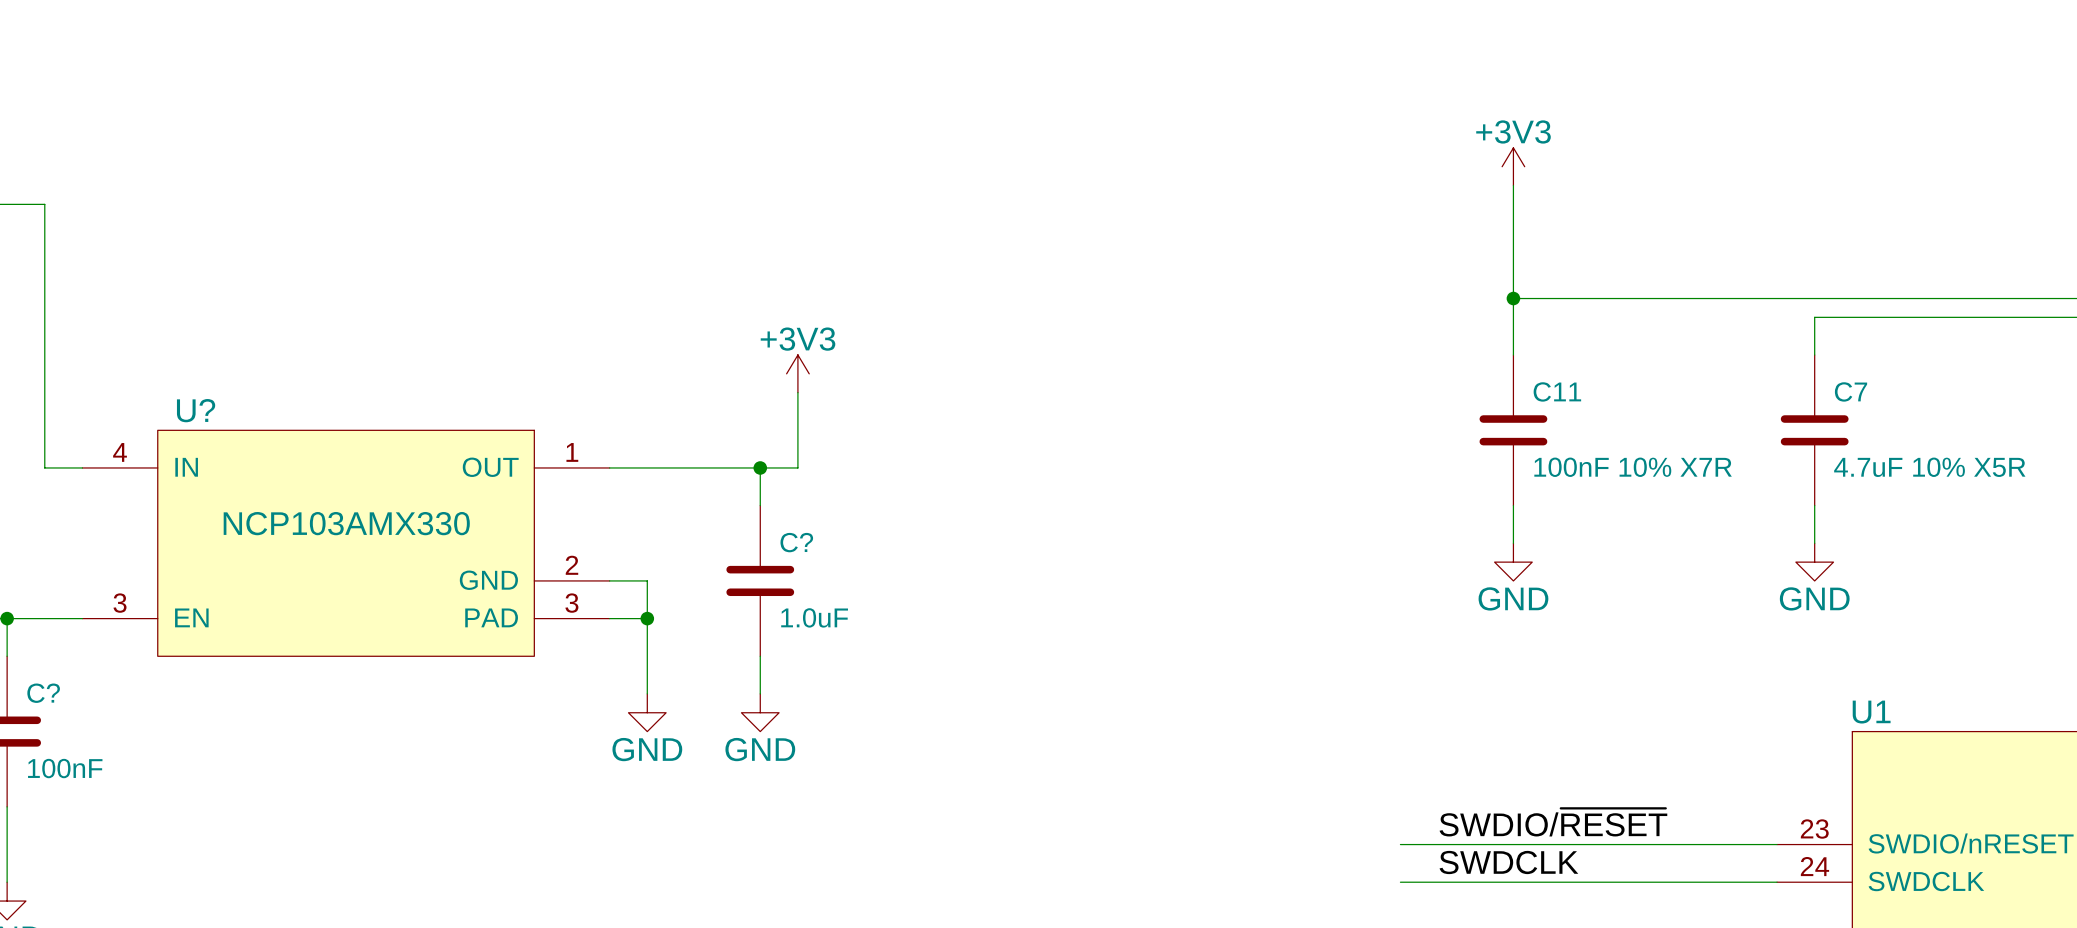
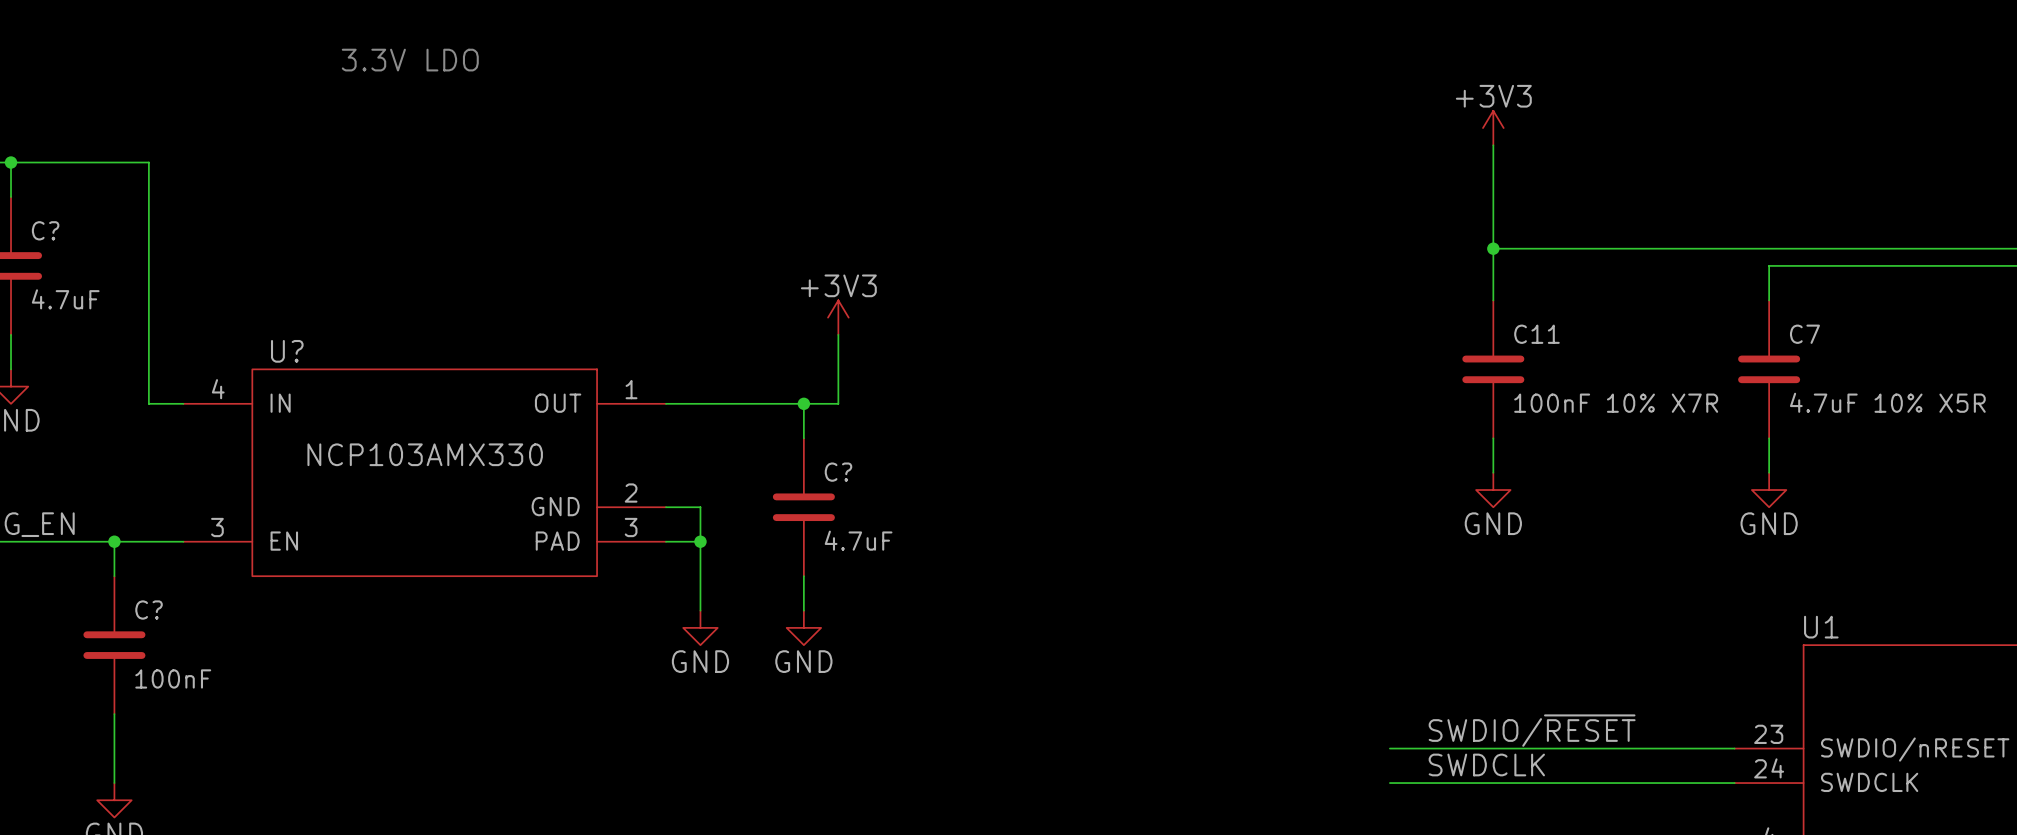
text: none -> 3.3V LDO (410, 60)
C? value: 1.0uF (814, 617) -> 4.7uF (858, 540)

